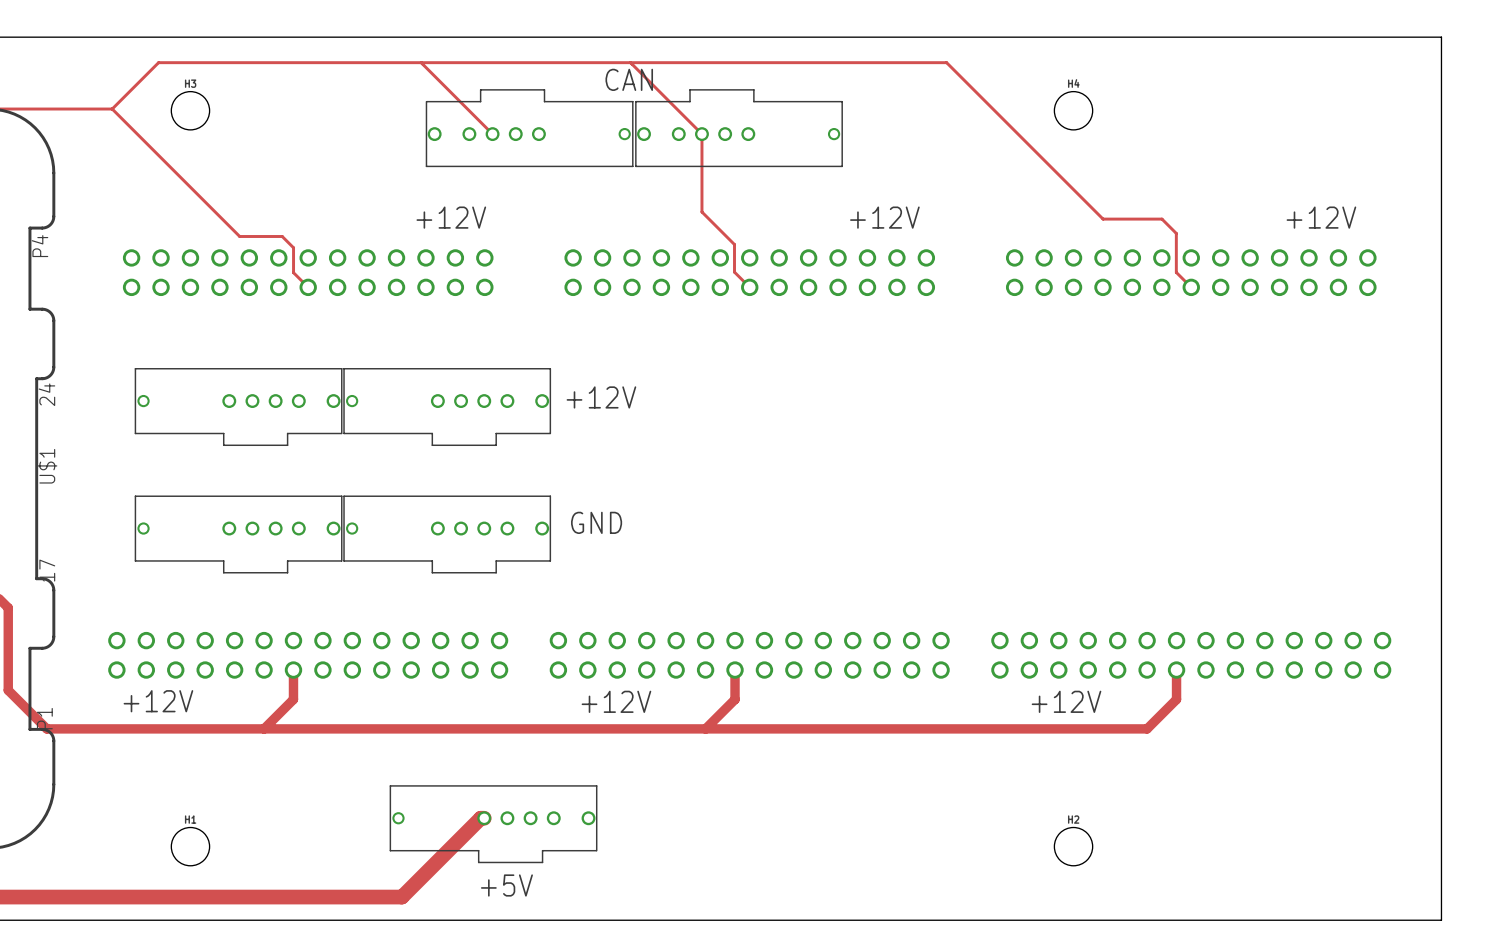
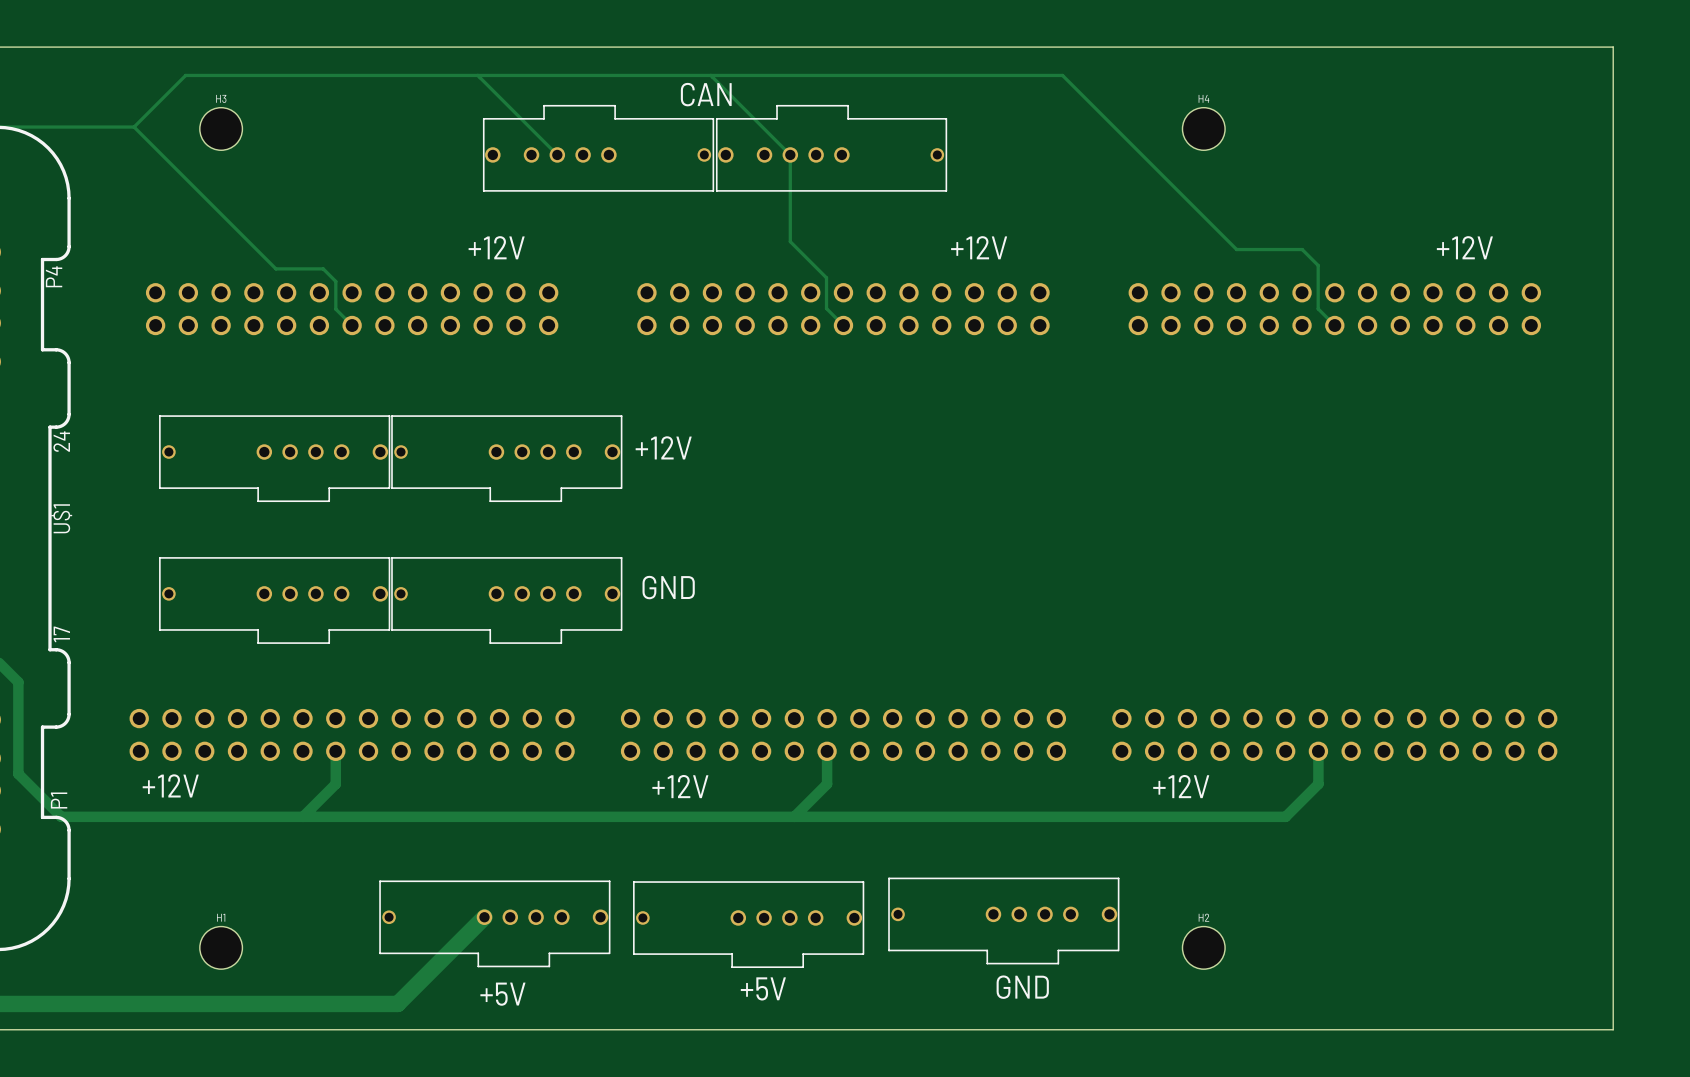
track: (484, 818) (480, 818) (401, 897) (349, 897) -> (484, 917) (397, 1003)
part: none -> (1003, 921)
part position: (493, 824) -> (494, 923)
part: none -> (748, 924)
text: none -> GND (1022, 987)
text: none -> +5V (763, 988)
text position: +5V (506, 885) -> +5V (502, 994)

